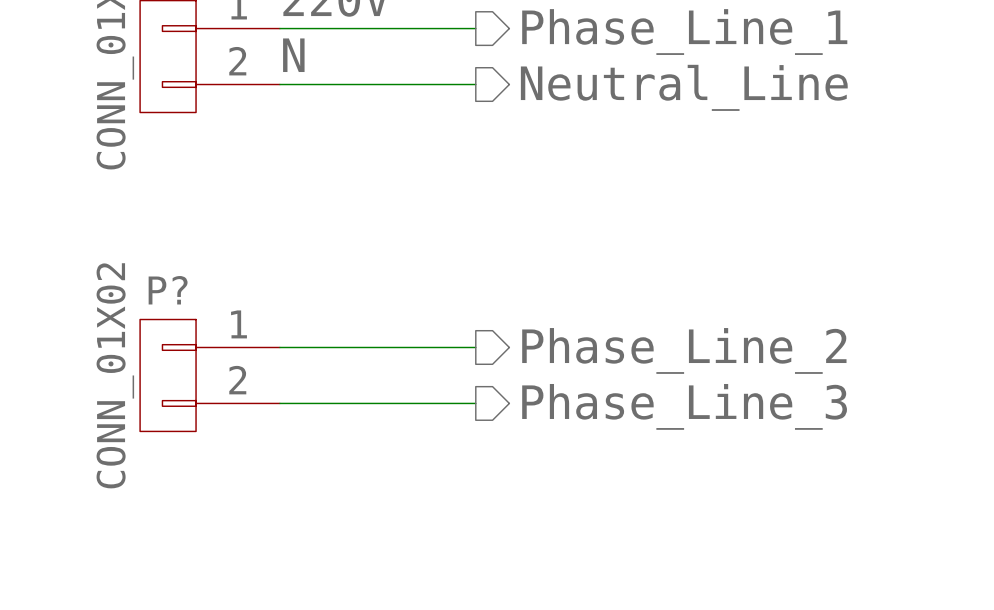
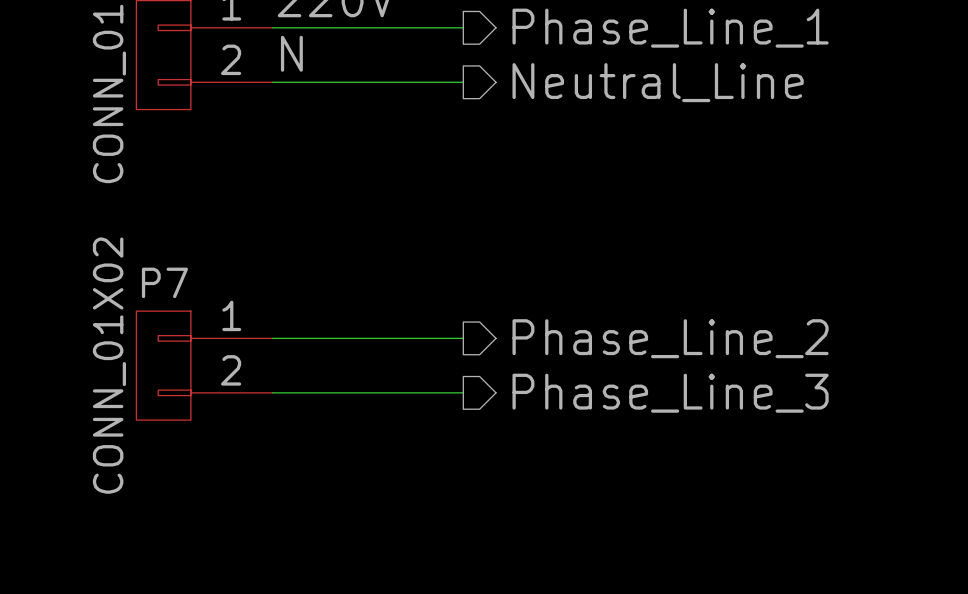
P? name: P? (168, 290) -> P7 (164, 282)

